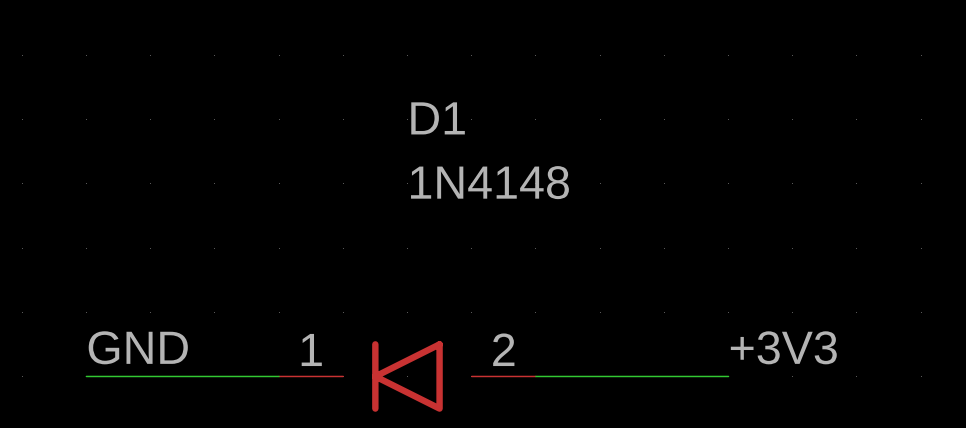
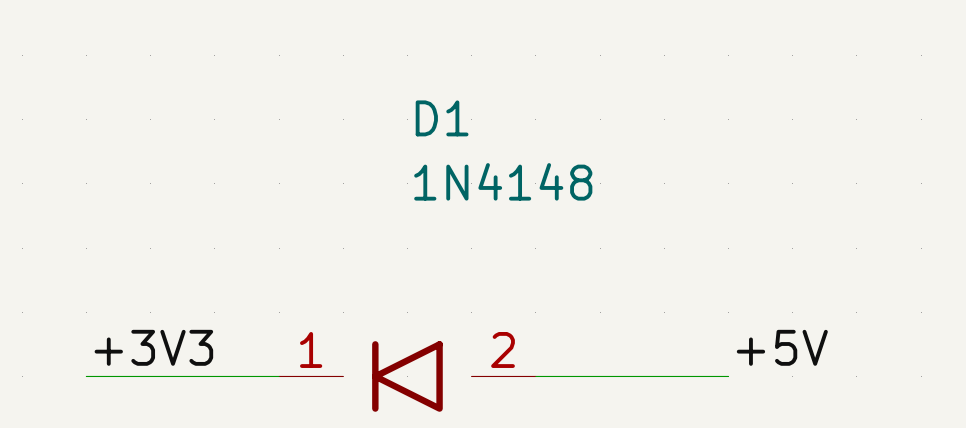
label: GND (138, 347) -> +3V3 (153, 347)
label: +3V3 (783, 347) -> +5V (782, 347)

